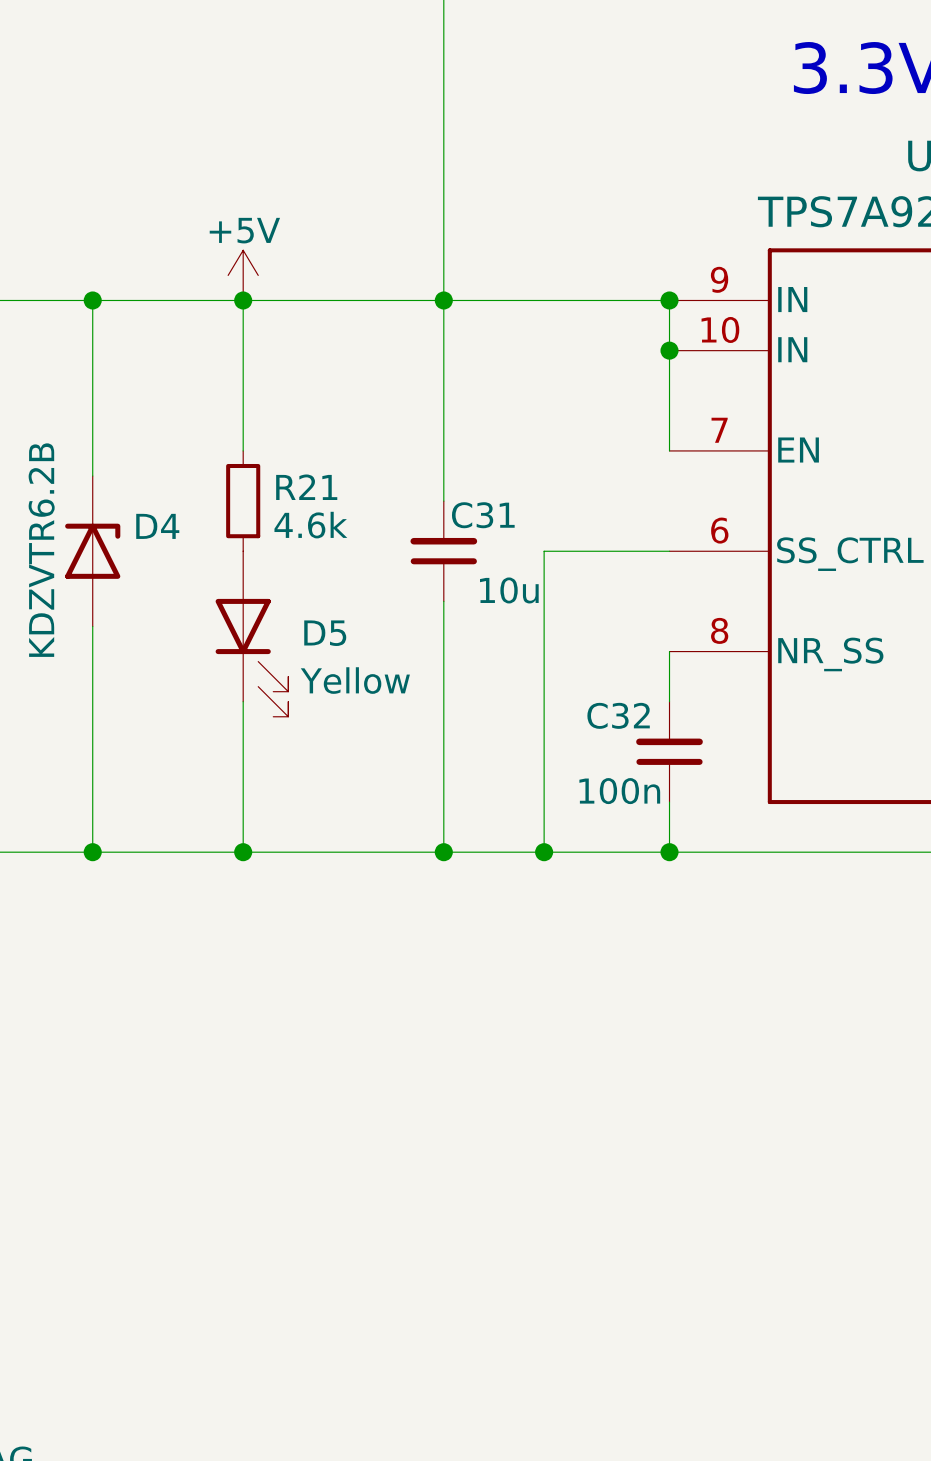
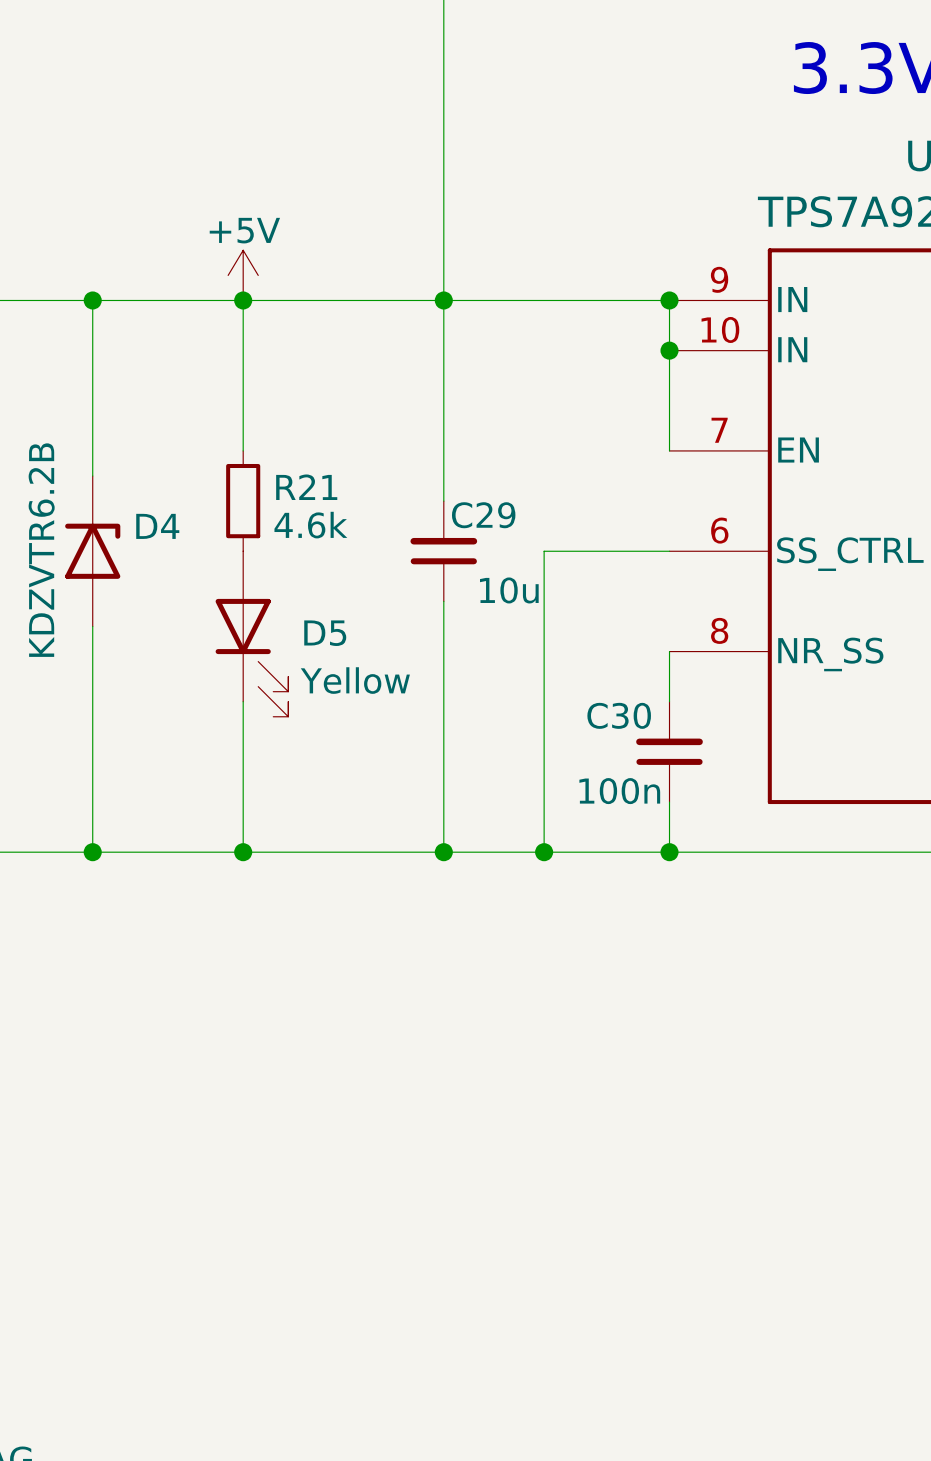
C31 name: C31 (483, 515) -> C29 (483, 515)
C32 name: C32 (618, 715) -> C30 (619, 715)

